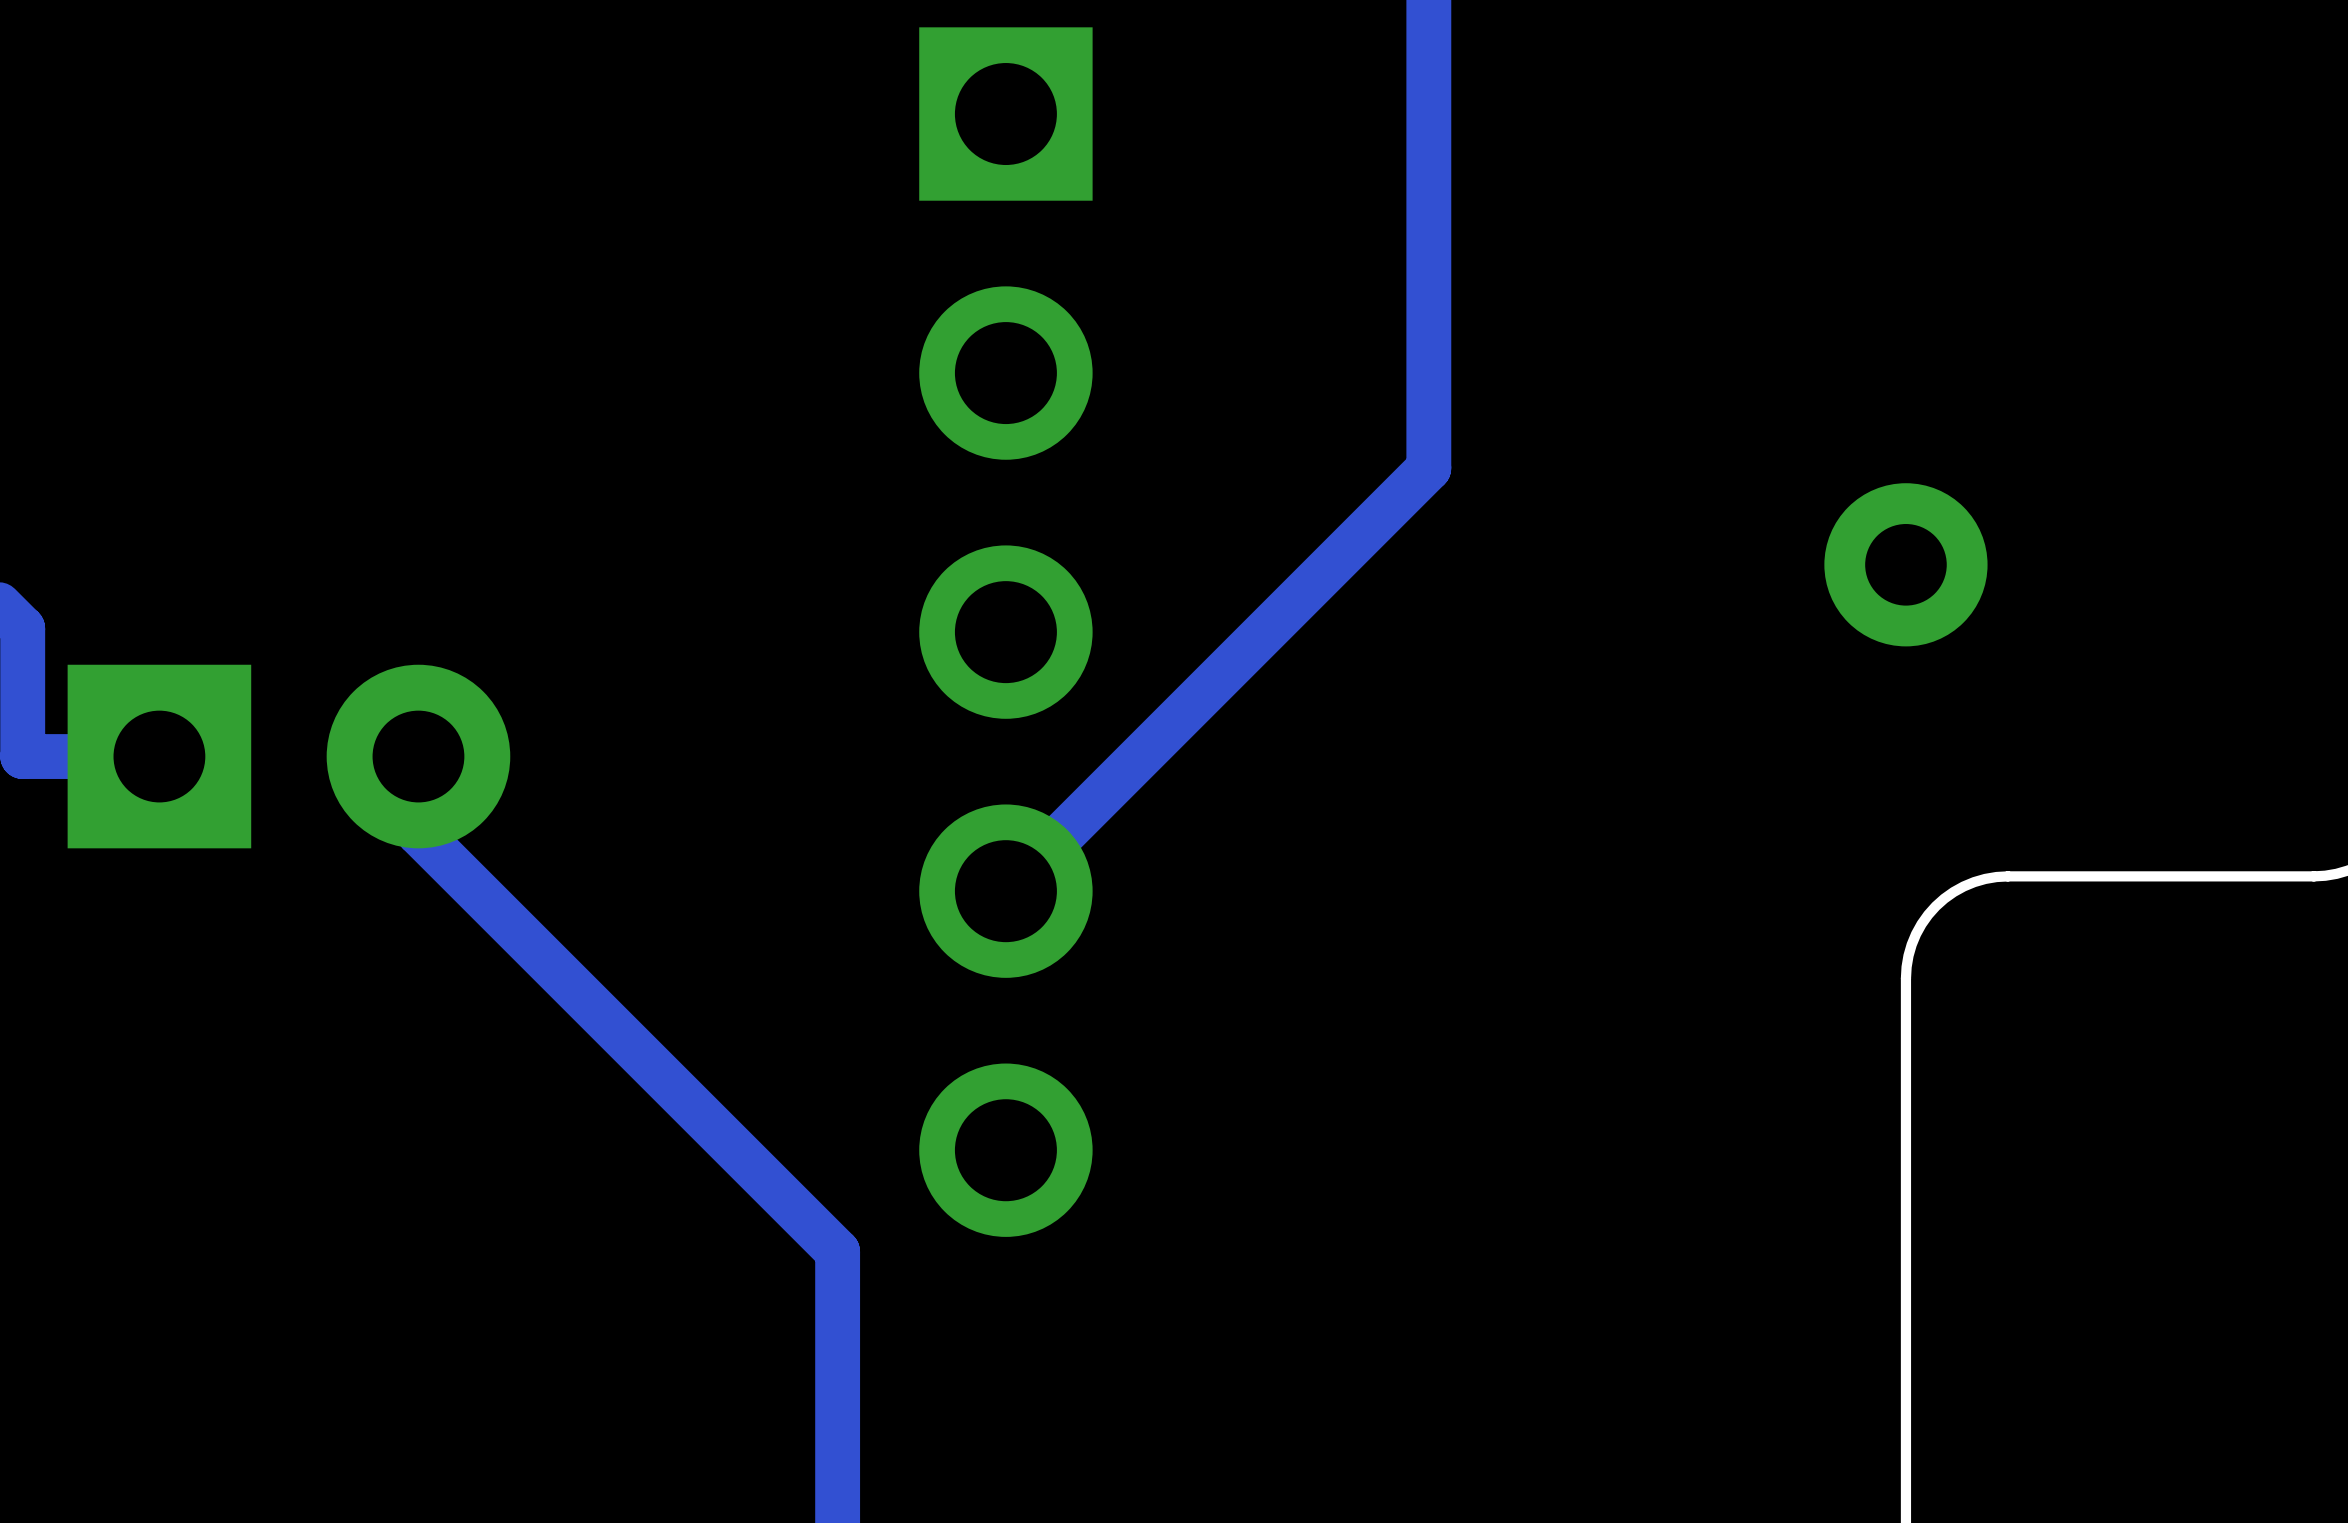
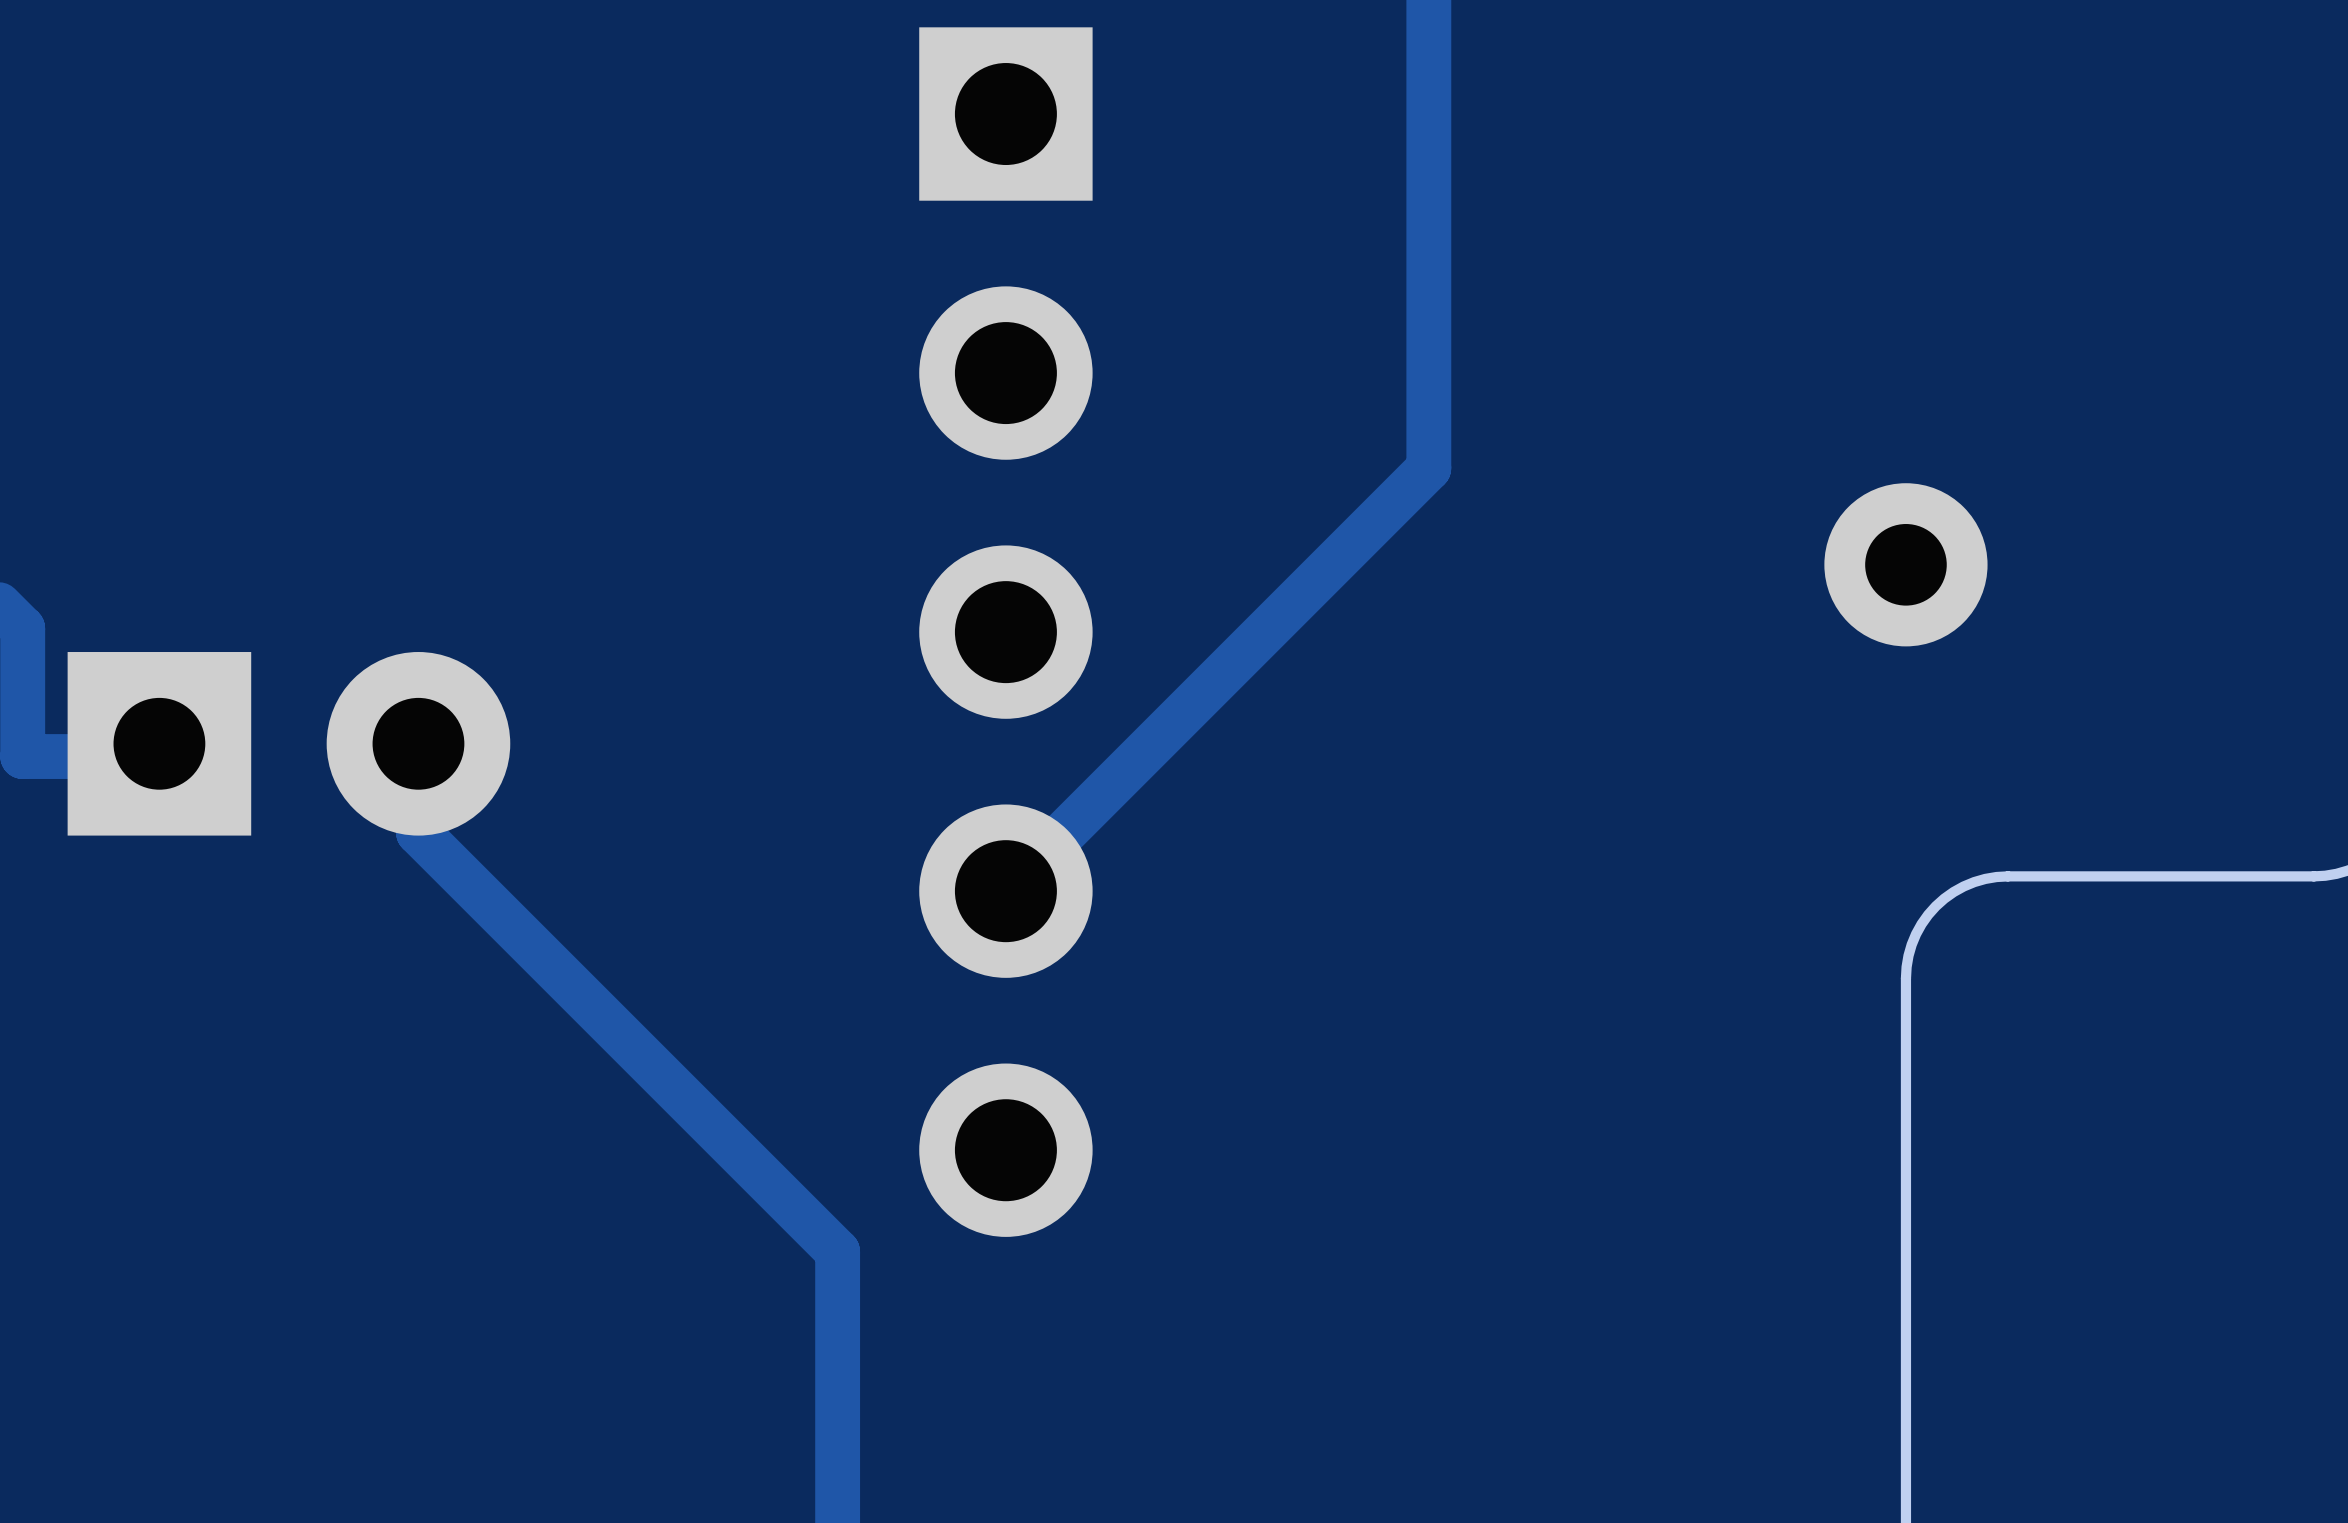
part position: (288, 756) -> (288, 743)

